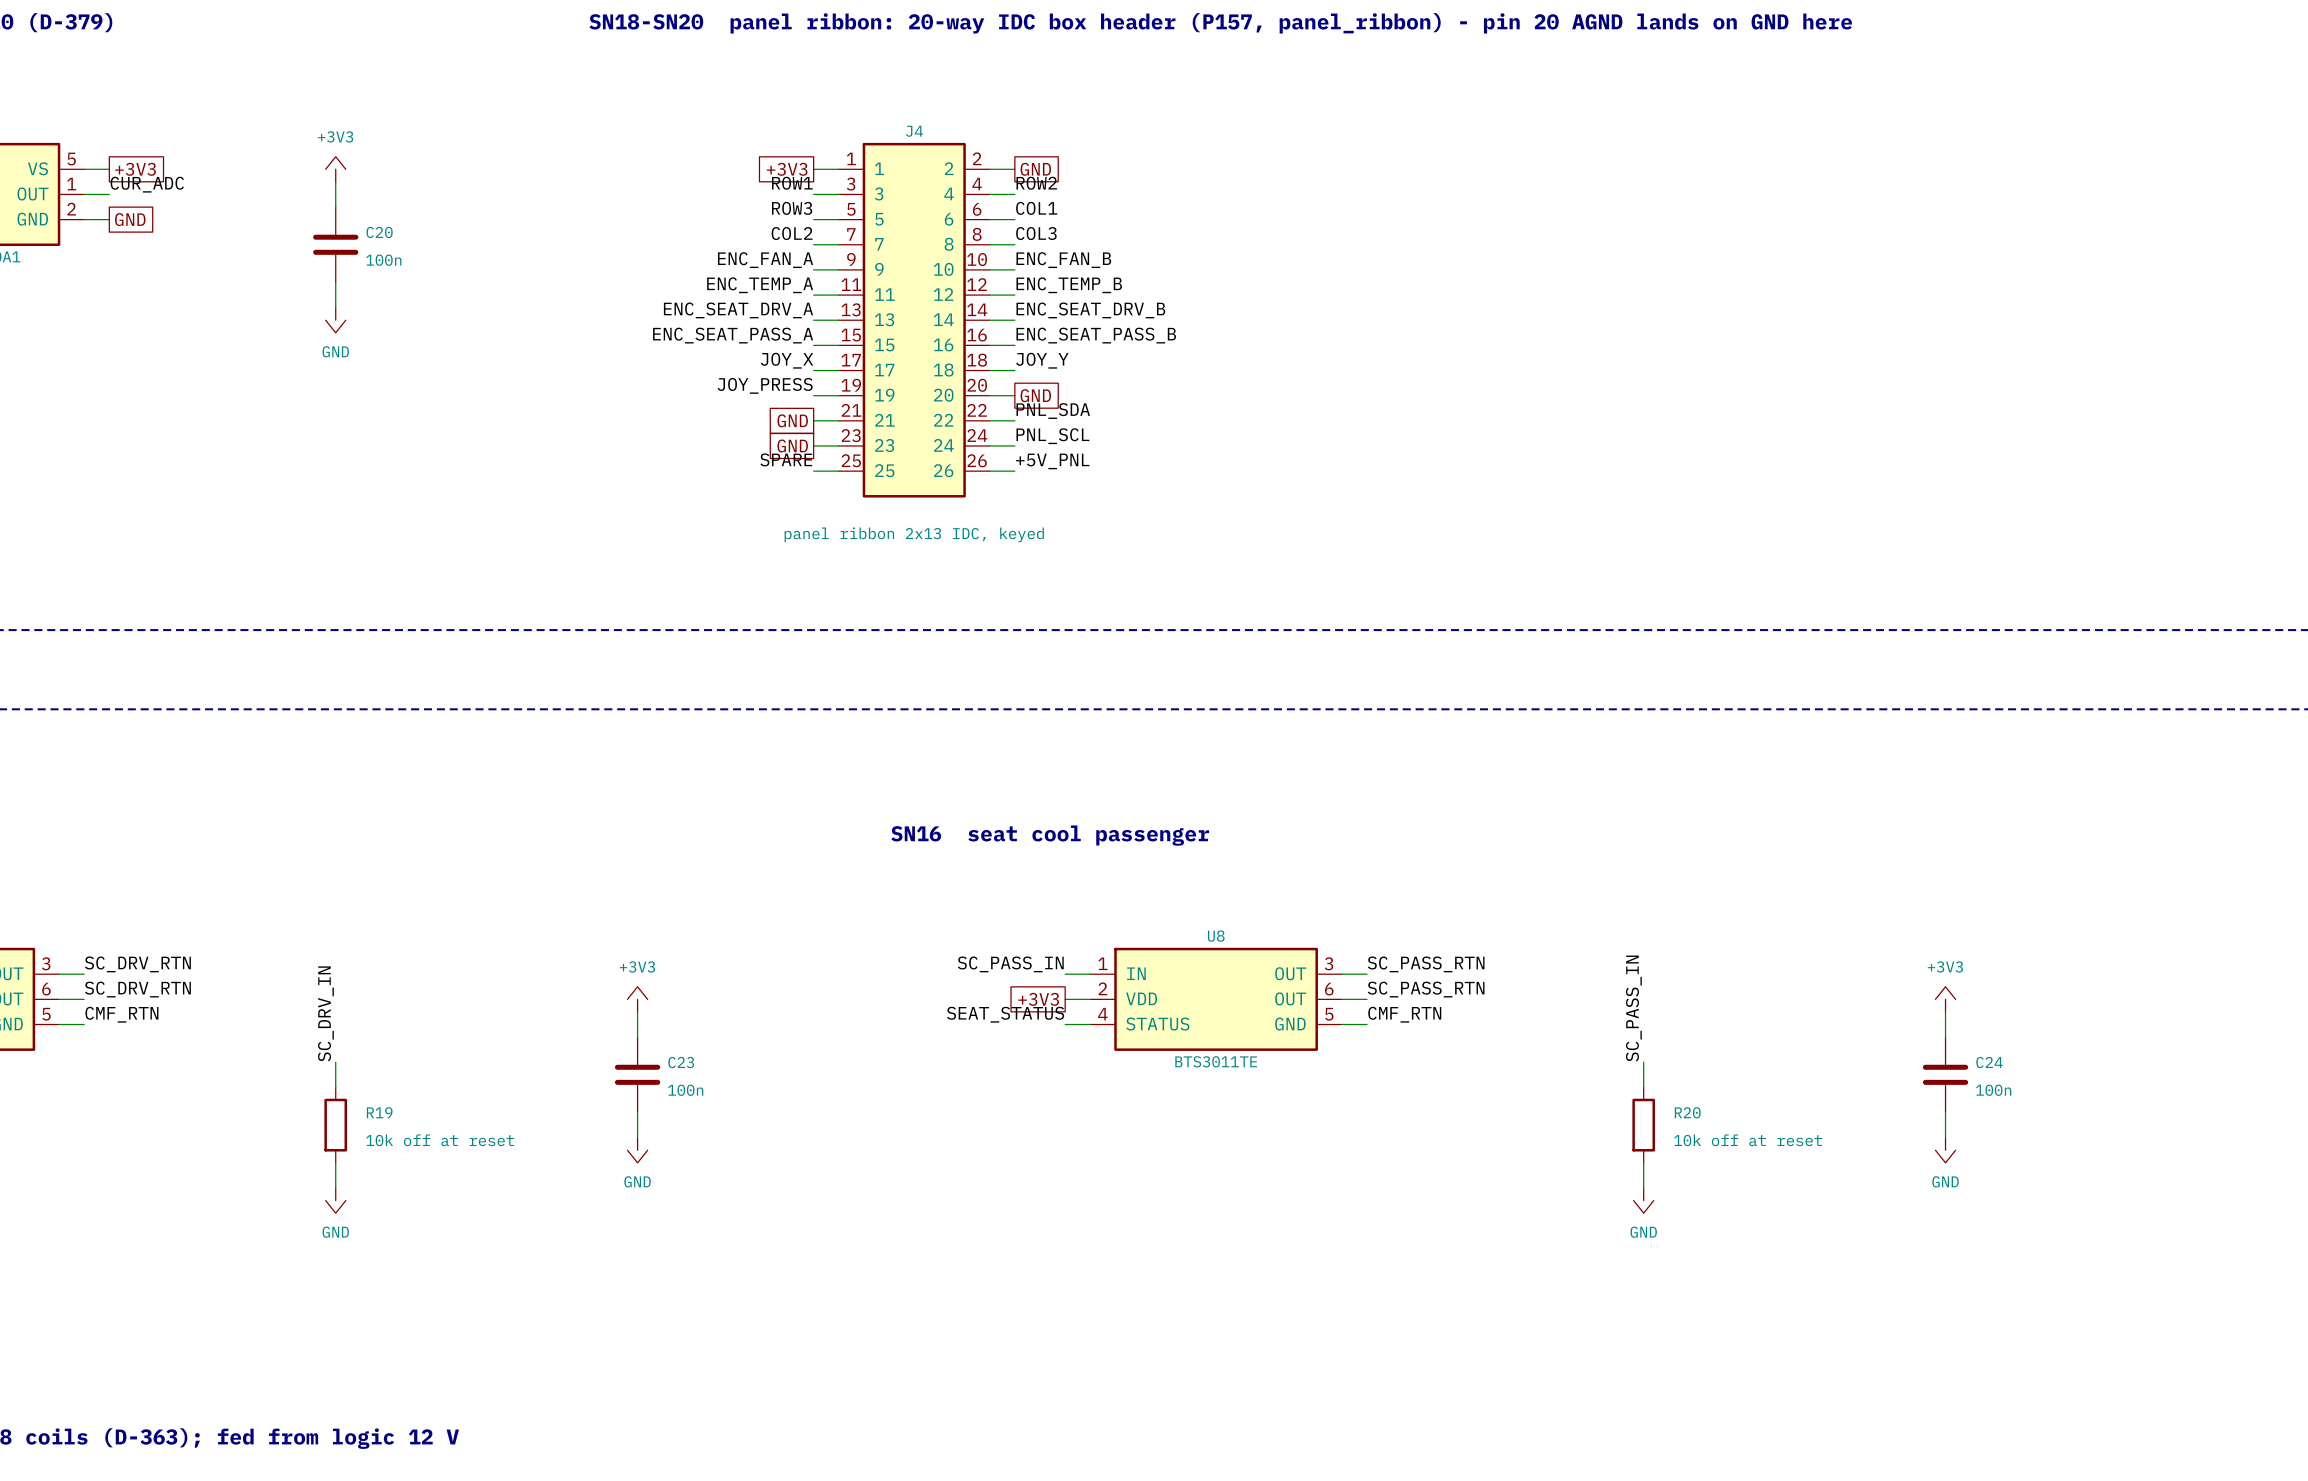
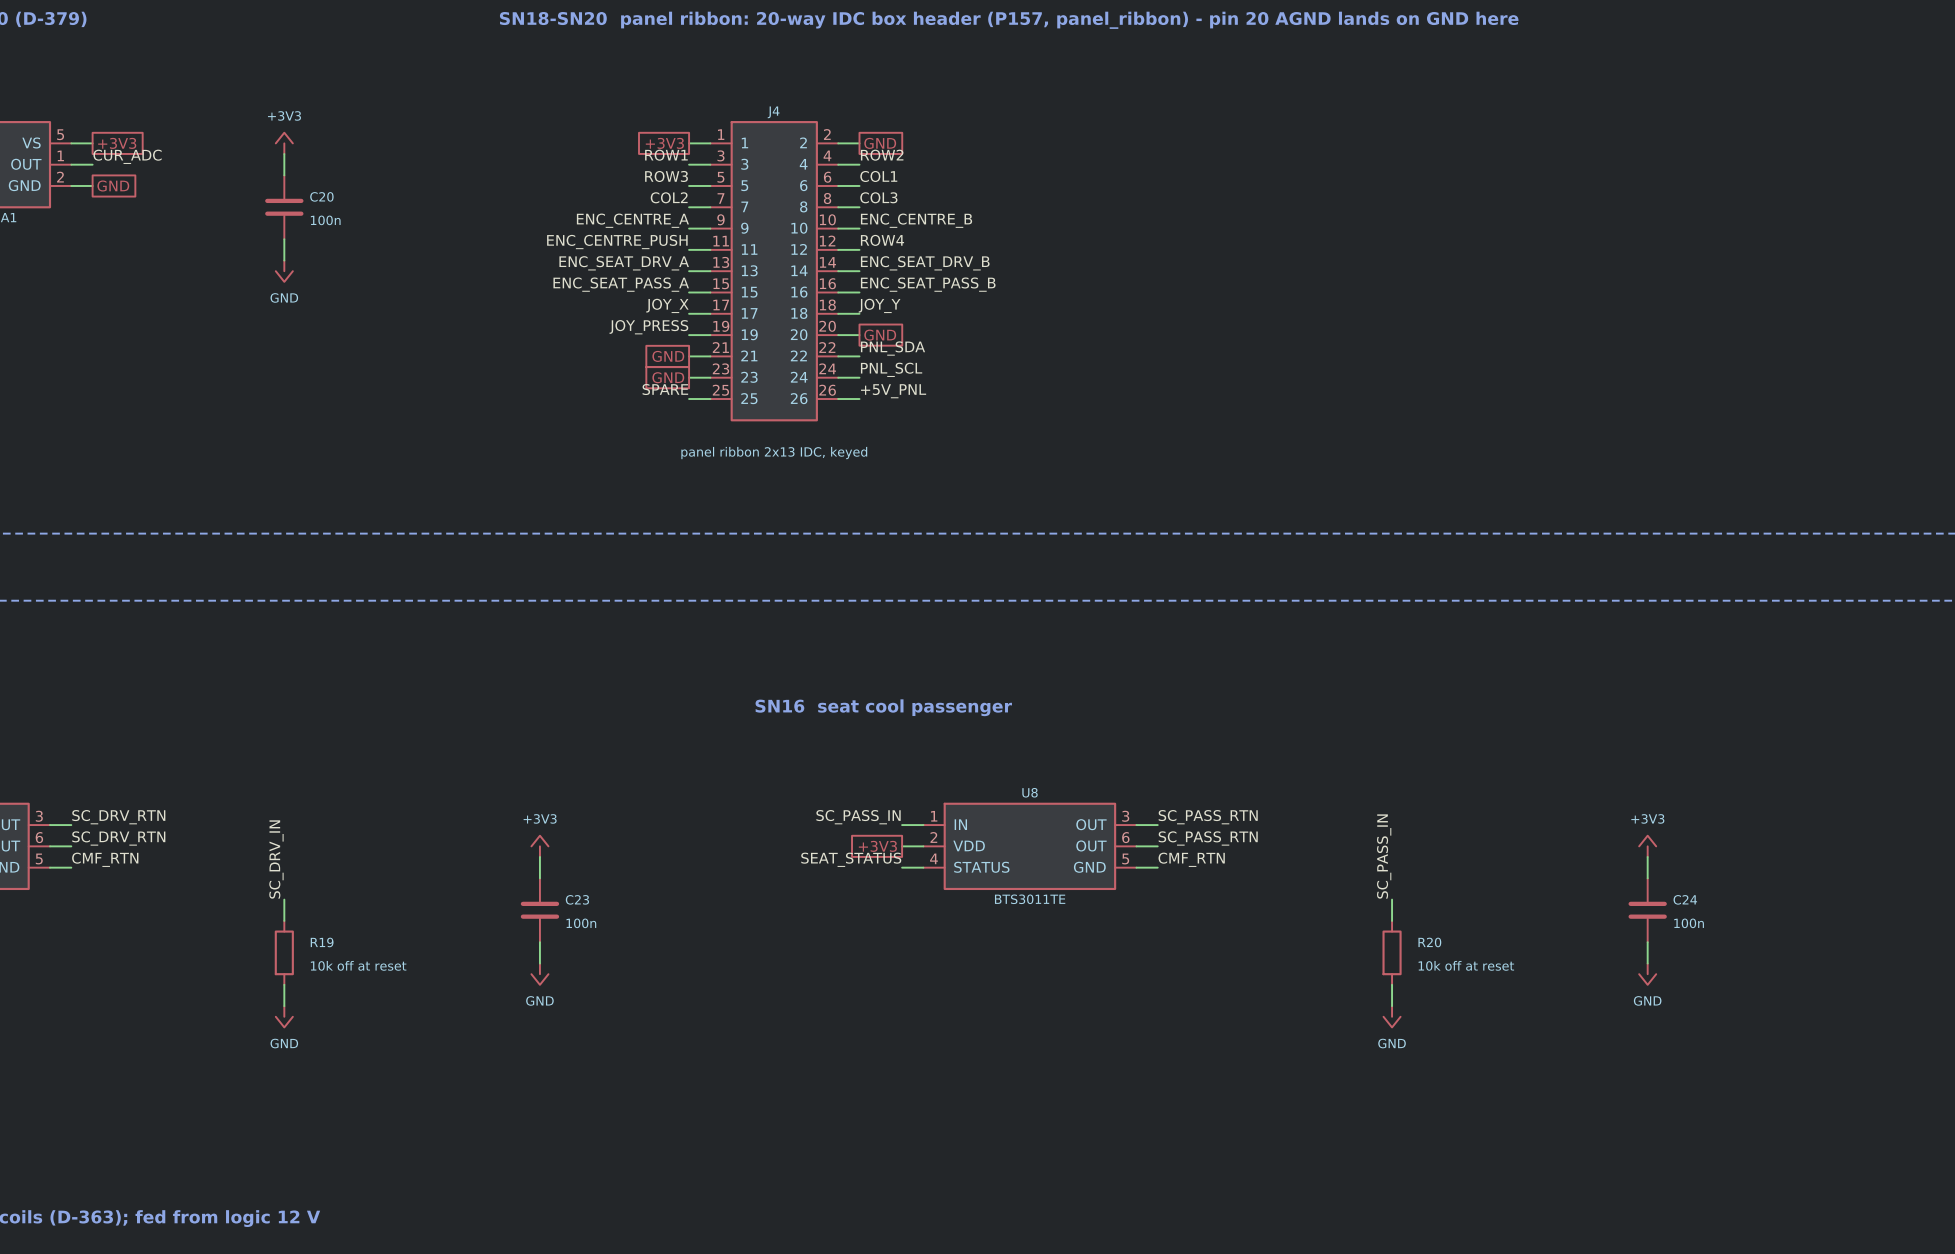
label: ENC_FAN_A (765, 260) -> ENC_CENTRE_A (632, 220)
label: ENC_FAN_B (1063, 260) -> ENC_CENTRE_B (916, 220)
label: ENC_TEMP_A (760, 285) -> ENC_CENTRE_PUSH (617, 242)
label: ENC_TEMP_B (1069, 285) -> ROW4 (882, 240)

